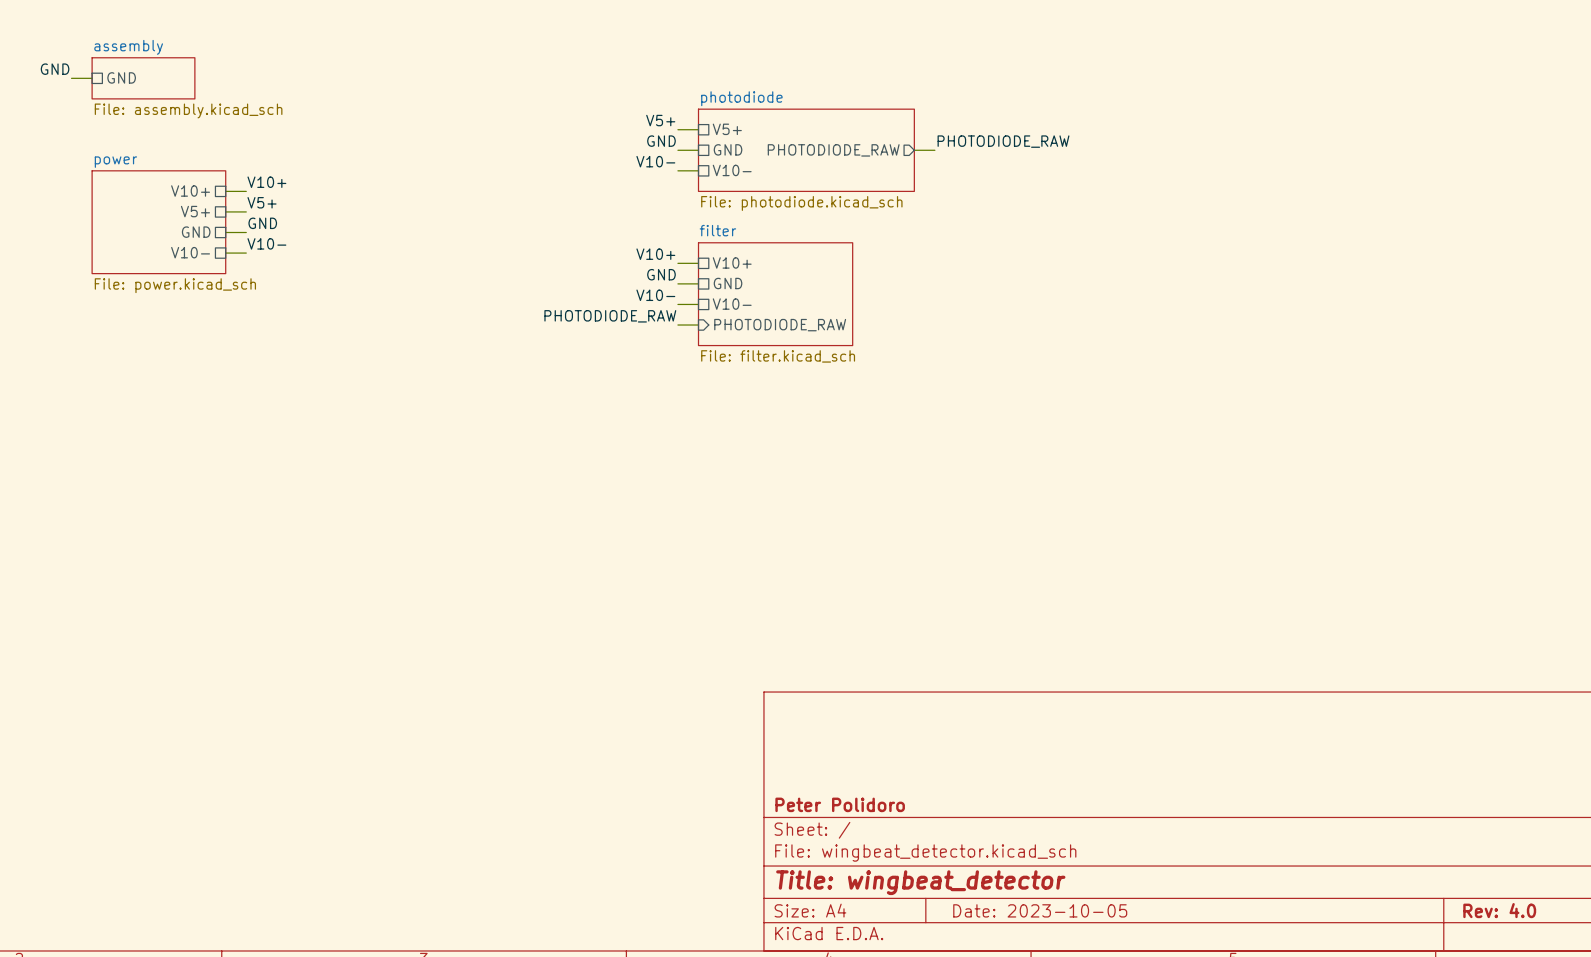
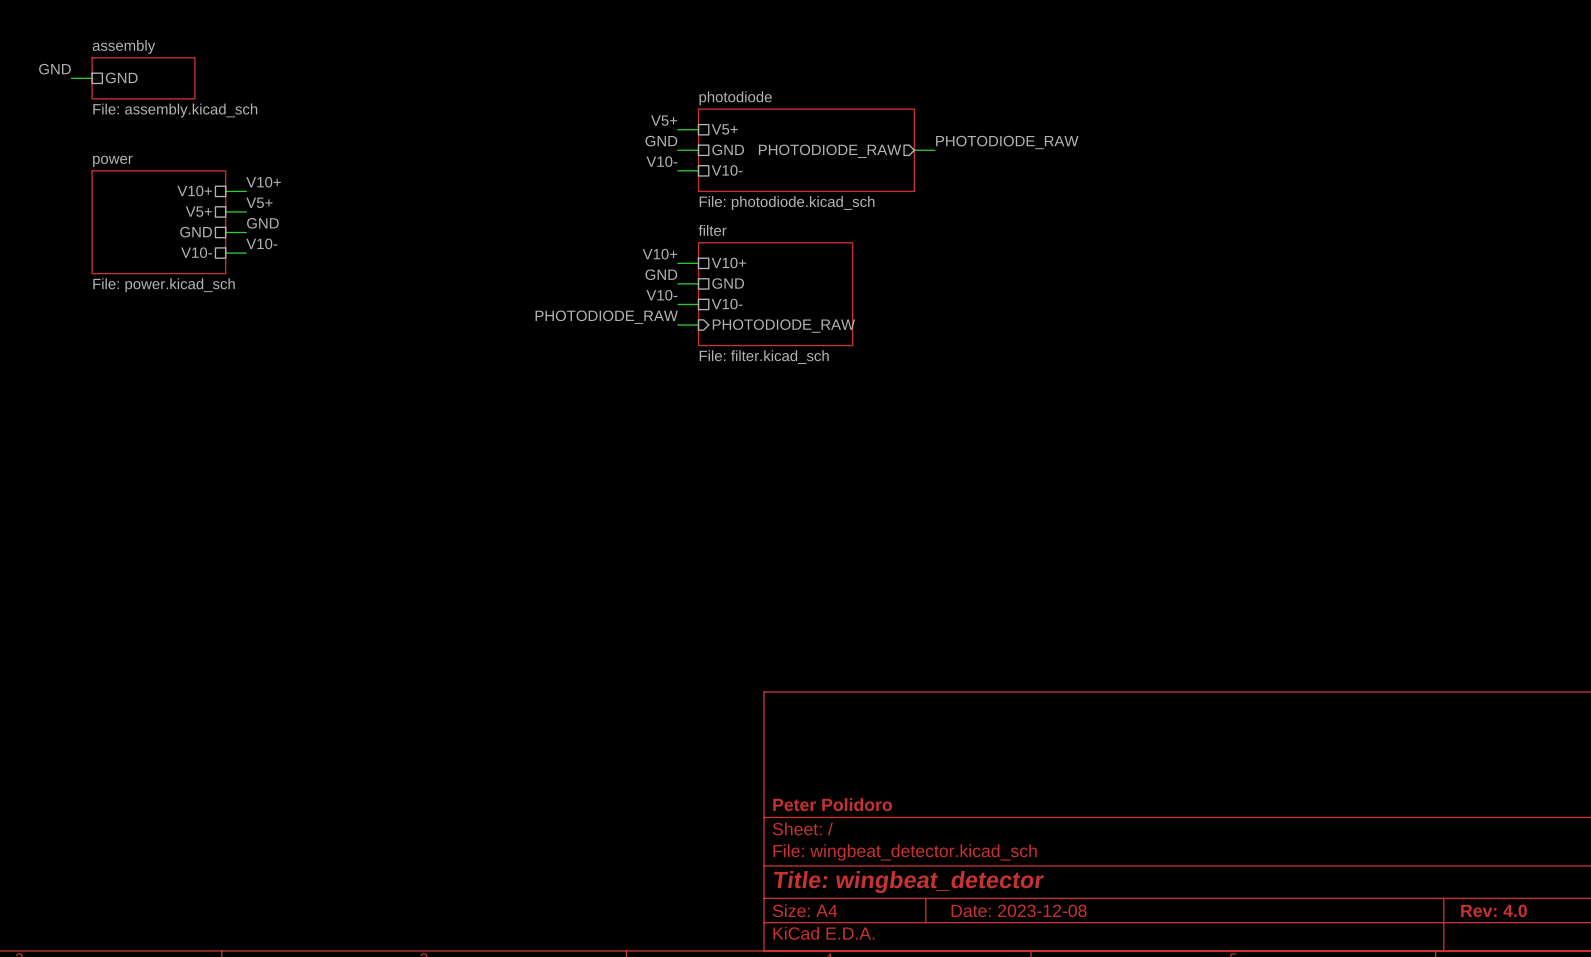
title block: Date: 2023-10-05 (1040, 910) -> Date: 2023-12-08 (1019, 910)

